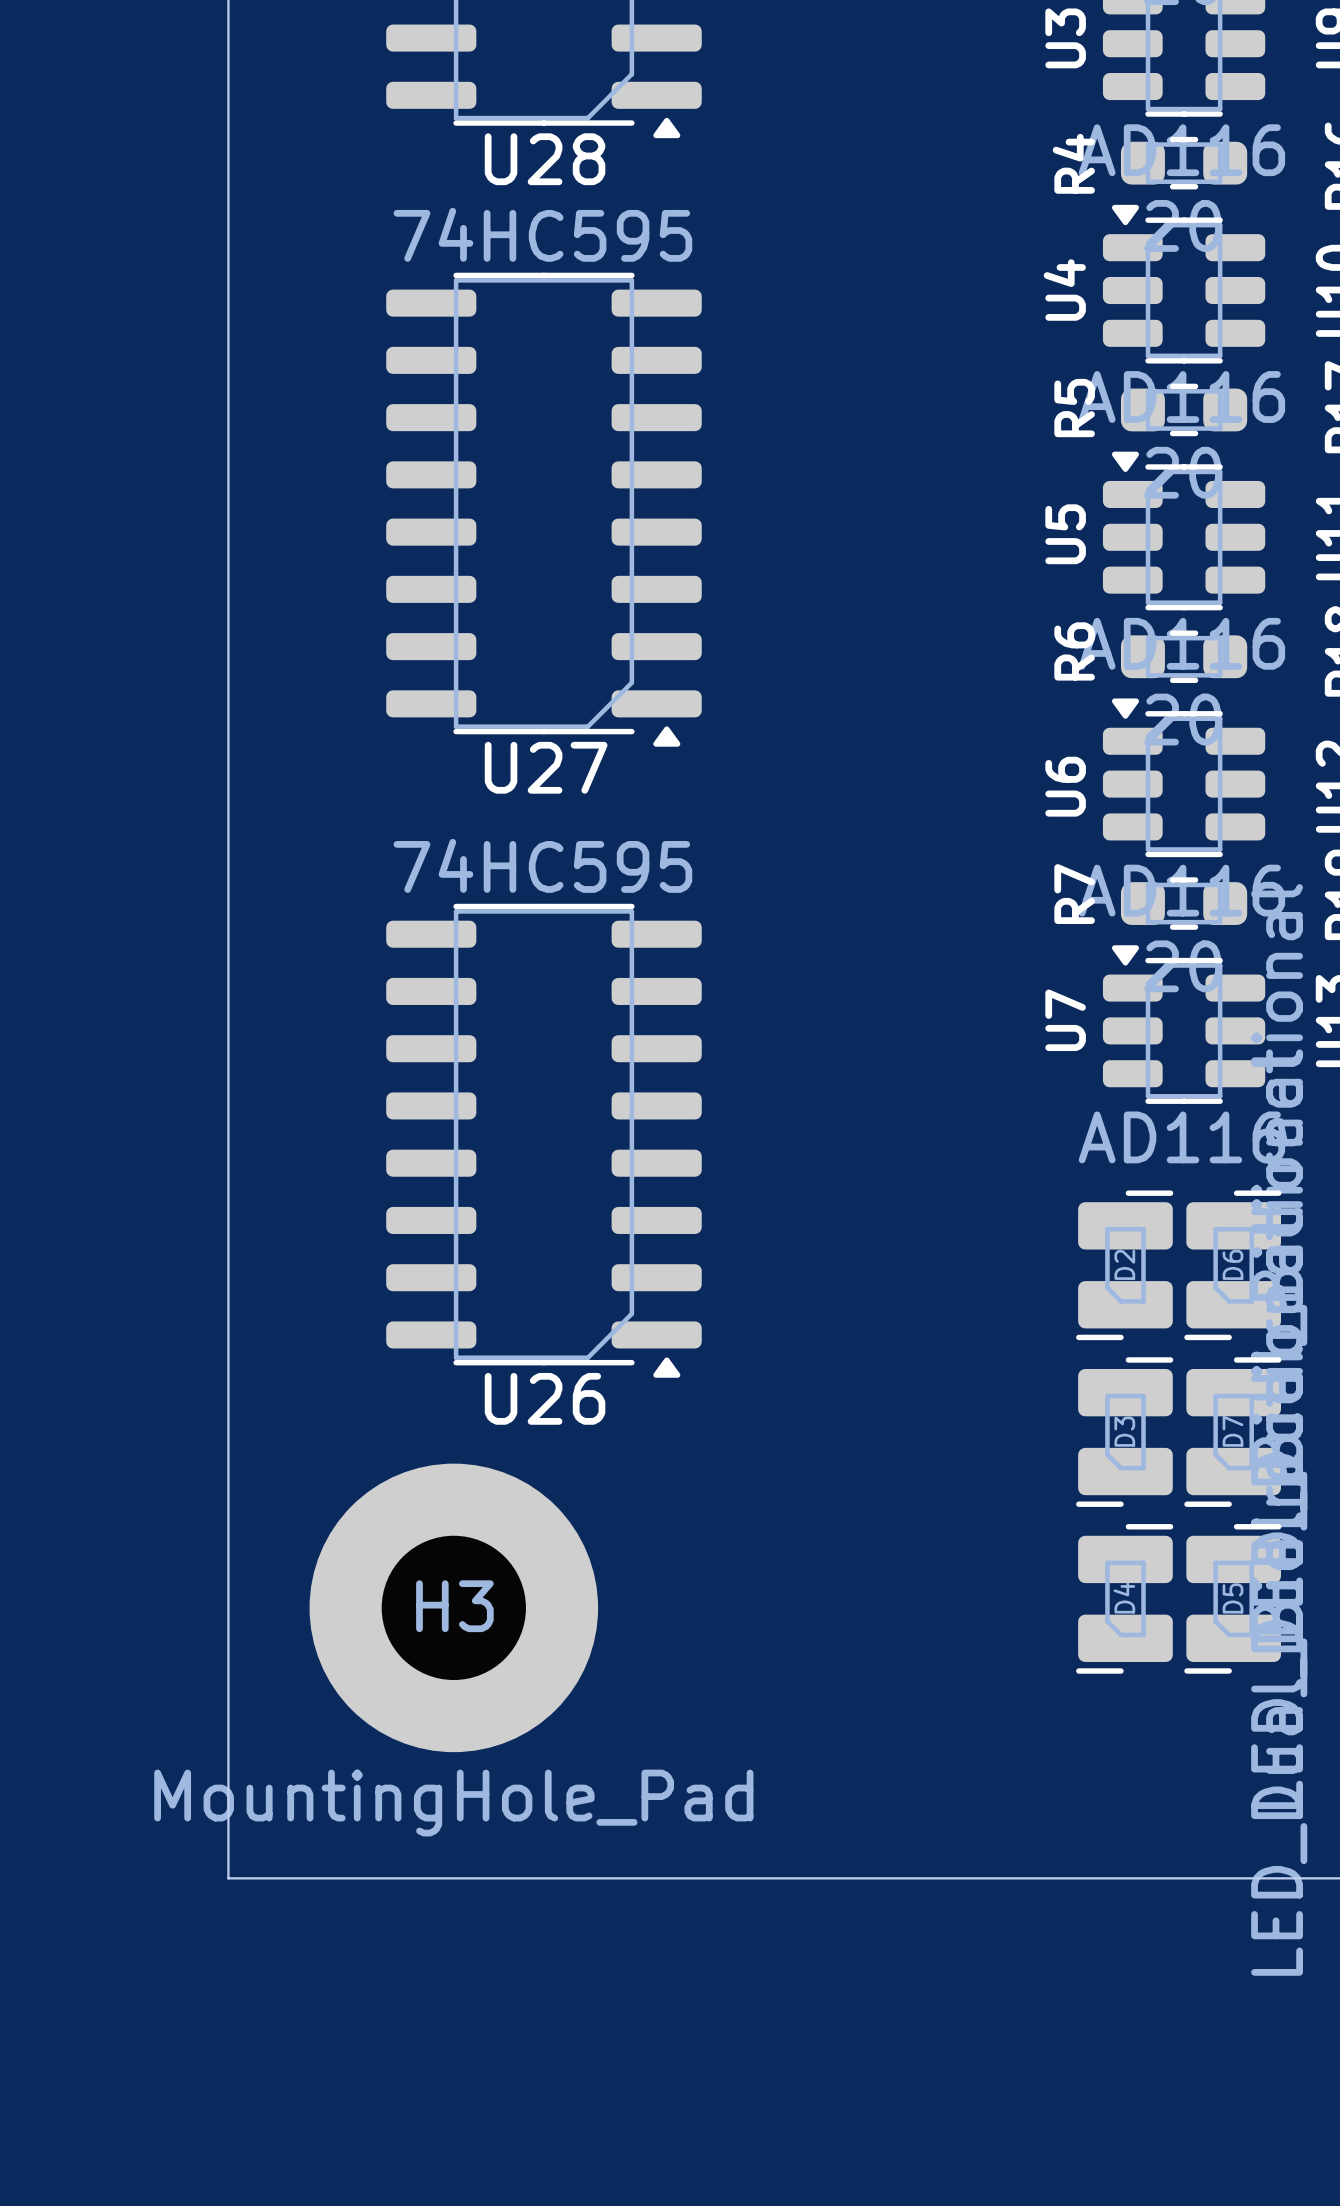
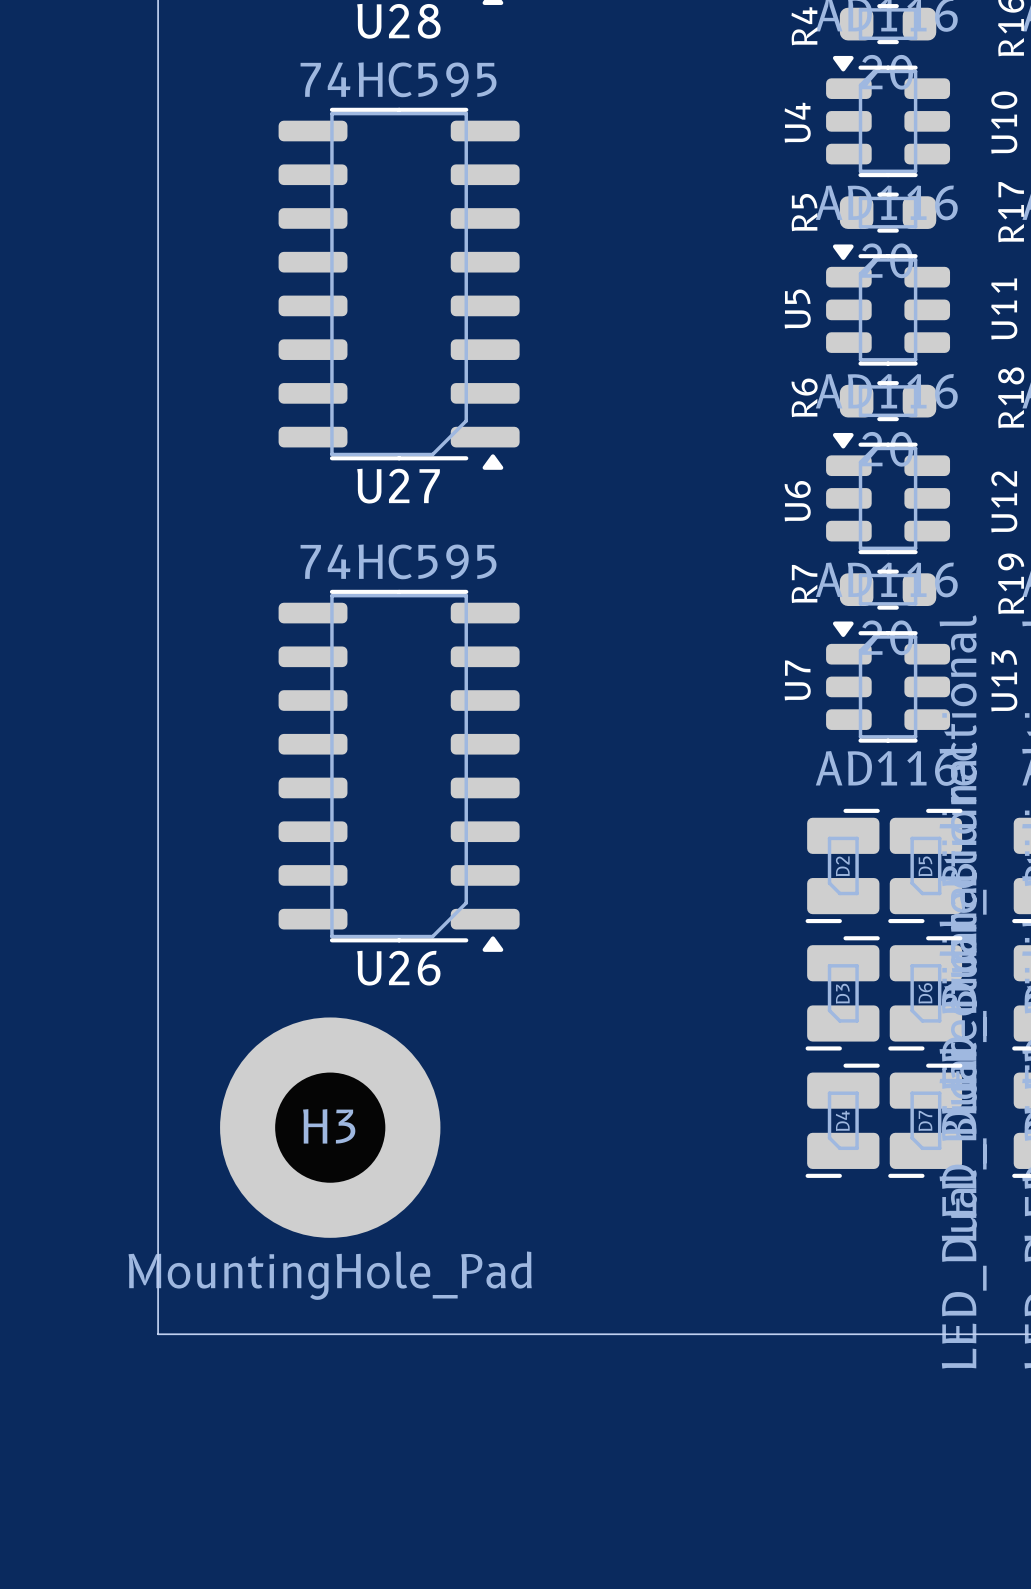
D6 name: D6 (1232, 1264) -> D5 (925, 866)
D7 name: D7 (1232, 1431) -> D6 (925, 993)
D5 name: D5 (1232, 1598) -> D7 (925, 1120)

